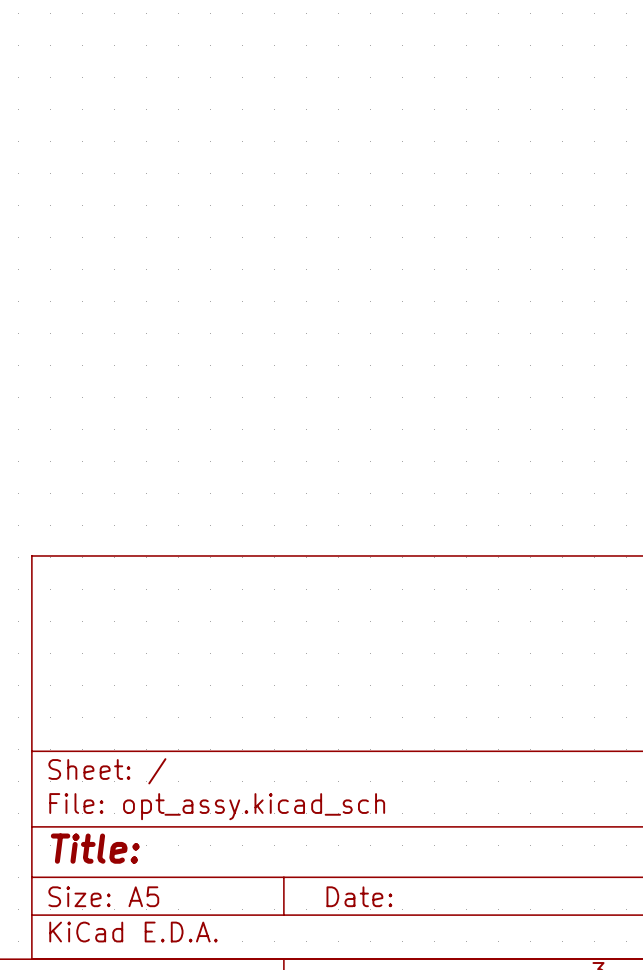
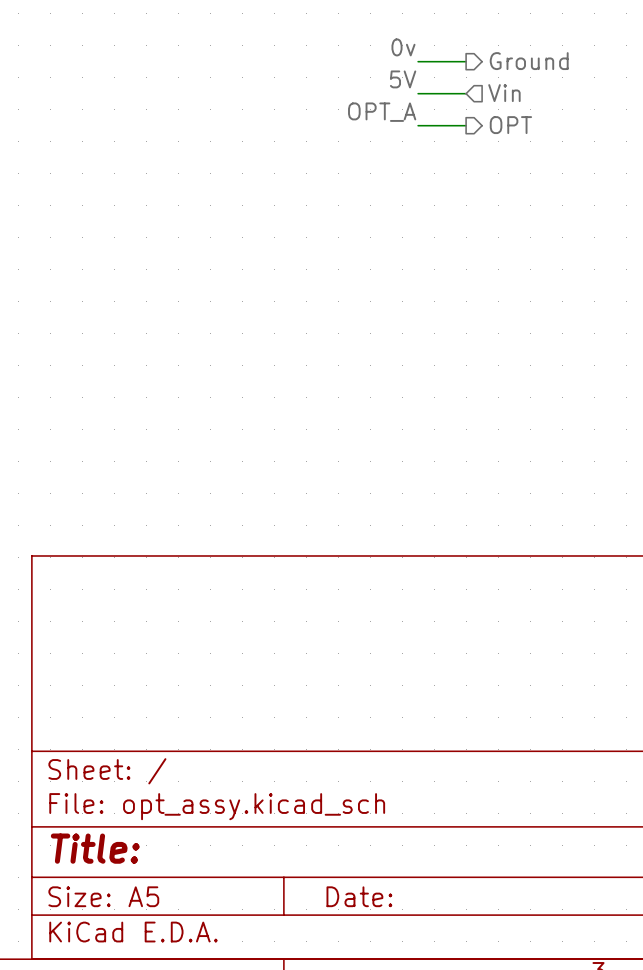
label: none -> 0v (403, 47)
wire: none -> (418, 61) (466, 61)
hierarchical label: none -> Ground (529, 61)
label: none -> 5V (403, 79)
wire: none -> (418, 93) (466, 93)
hierarchical label: none -> Vin (504, 93)
label: none -> OPT_A (382, 112)
wire: none -> (418, 125) (466, 125)
hierarchical label: none -> OPT (510, 125)

